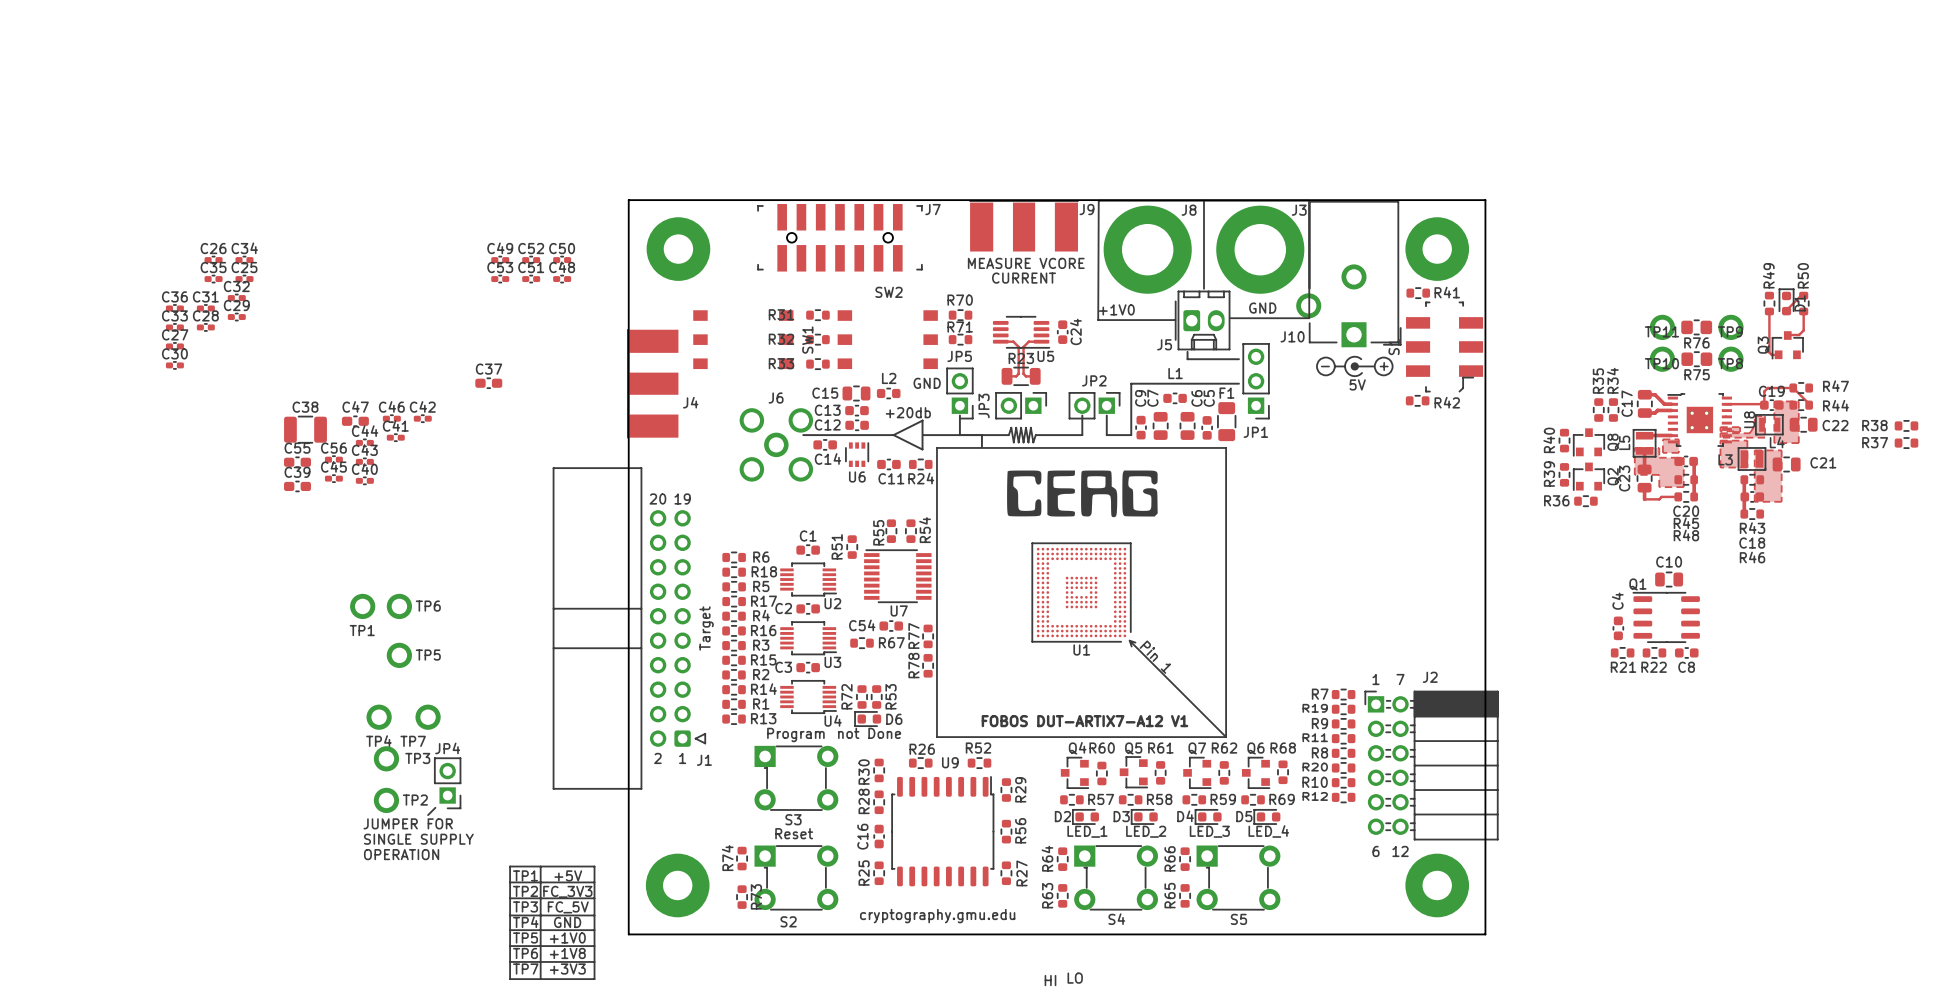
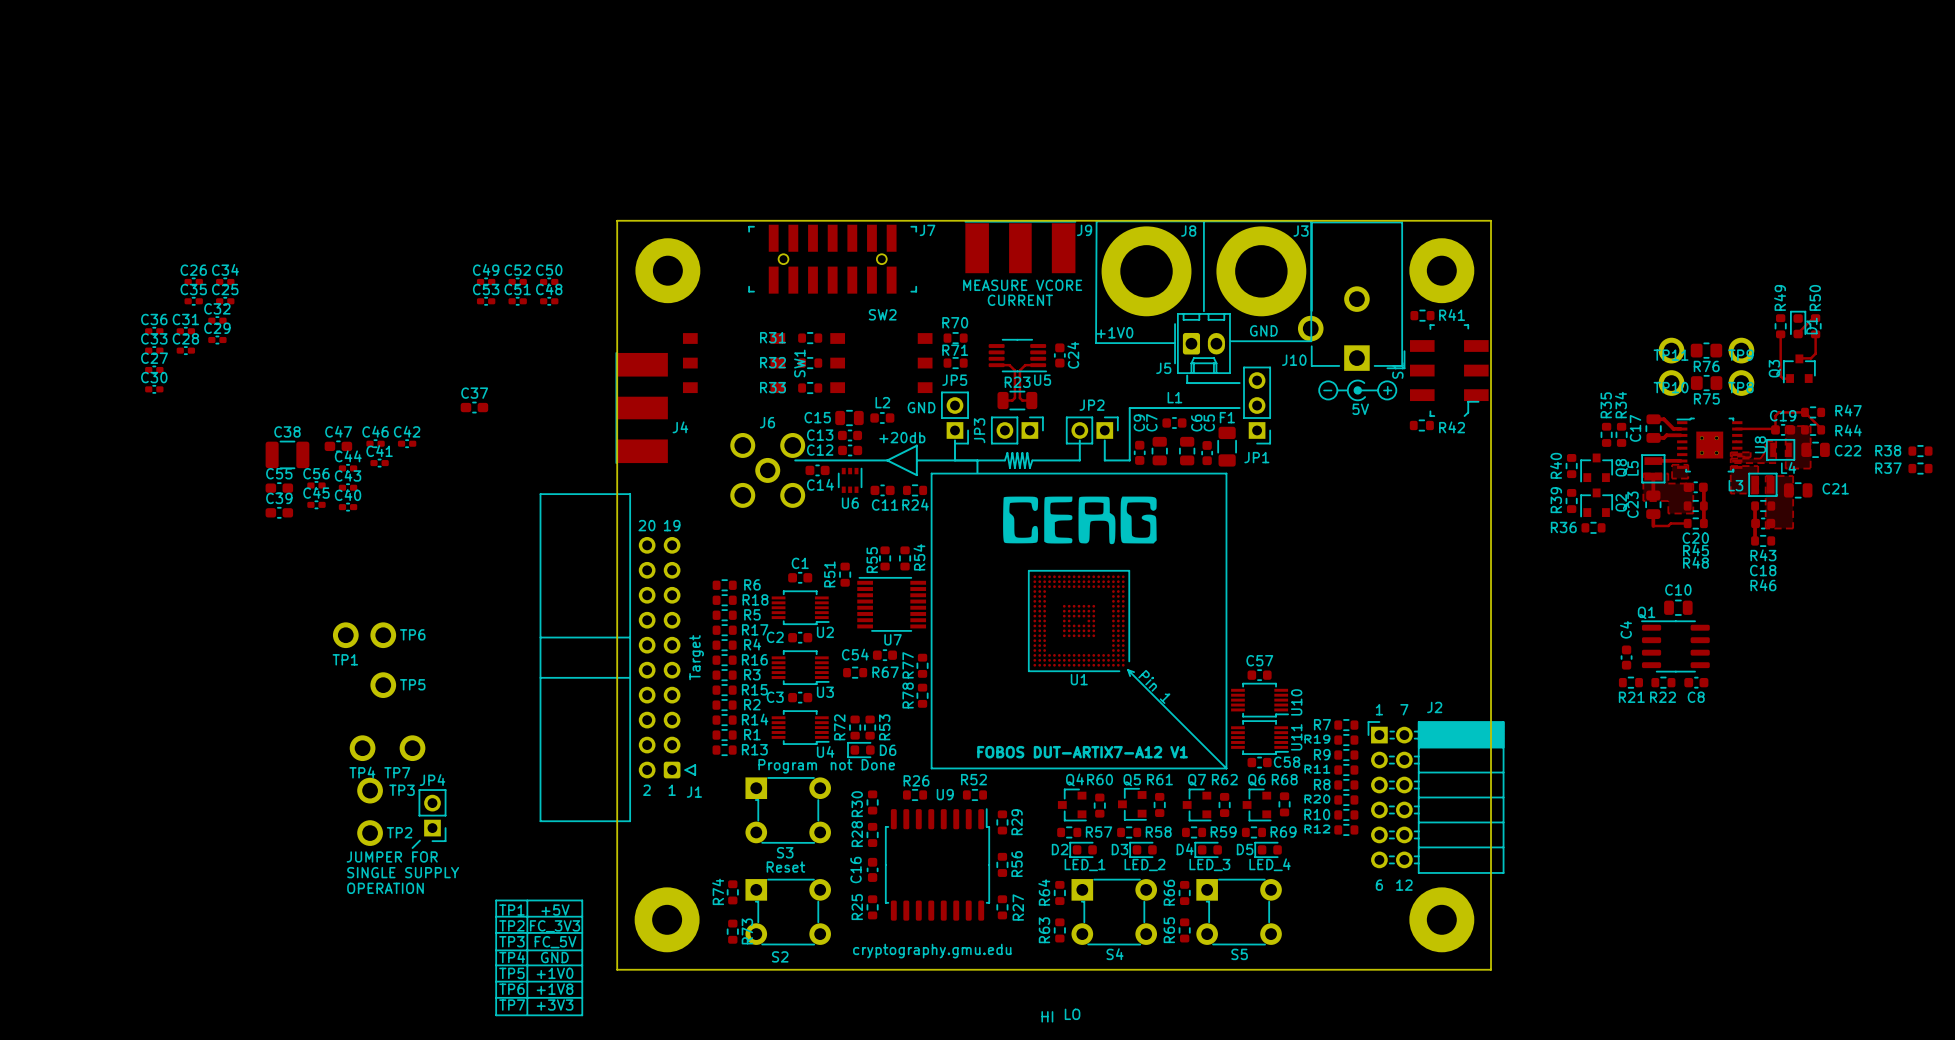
C57: none -> (1259, 675)
U10: none -> (1259, 700)
U11: none -> (1259, 737)
C58: none -> (1259, 762)

